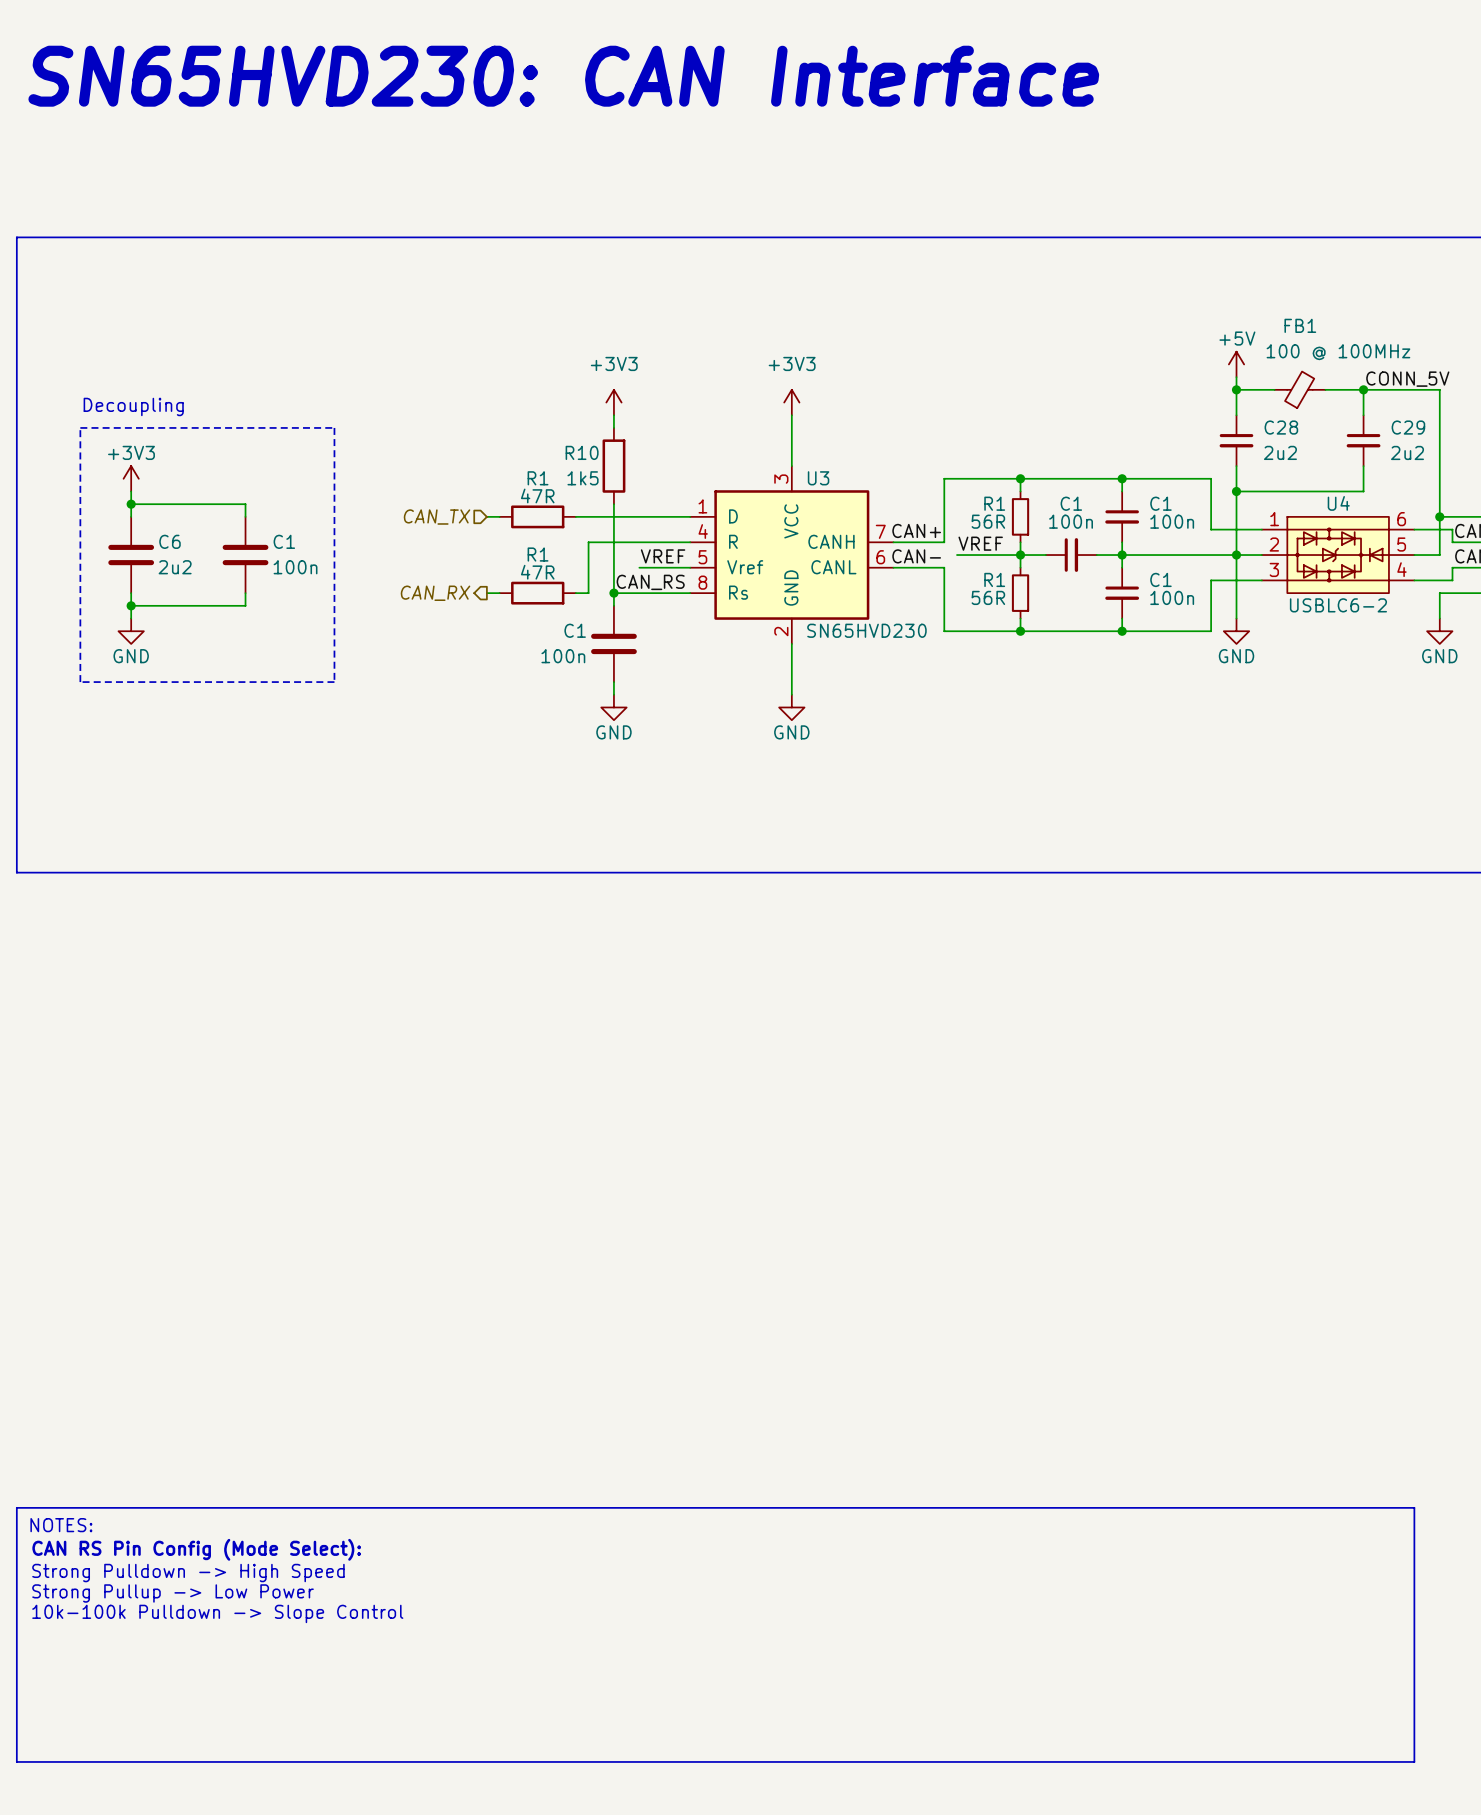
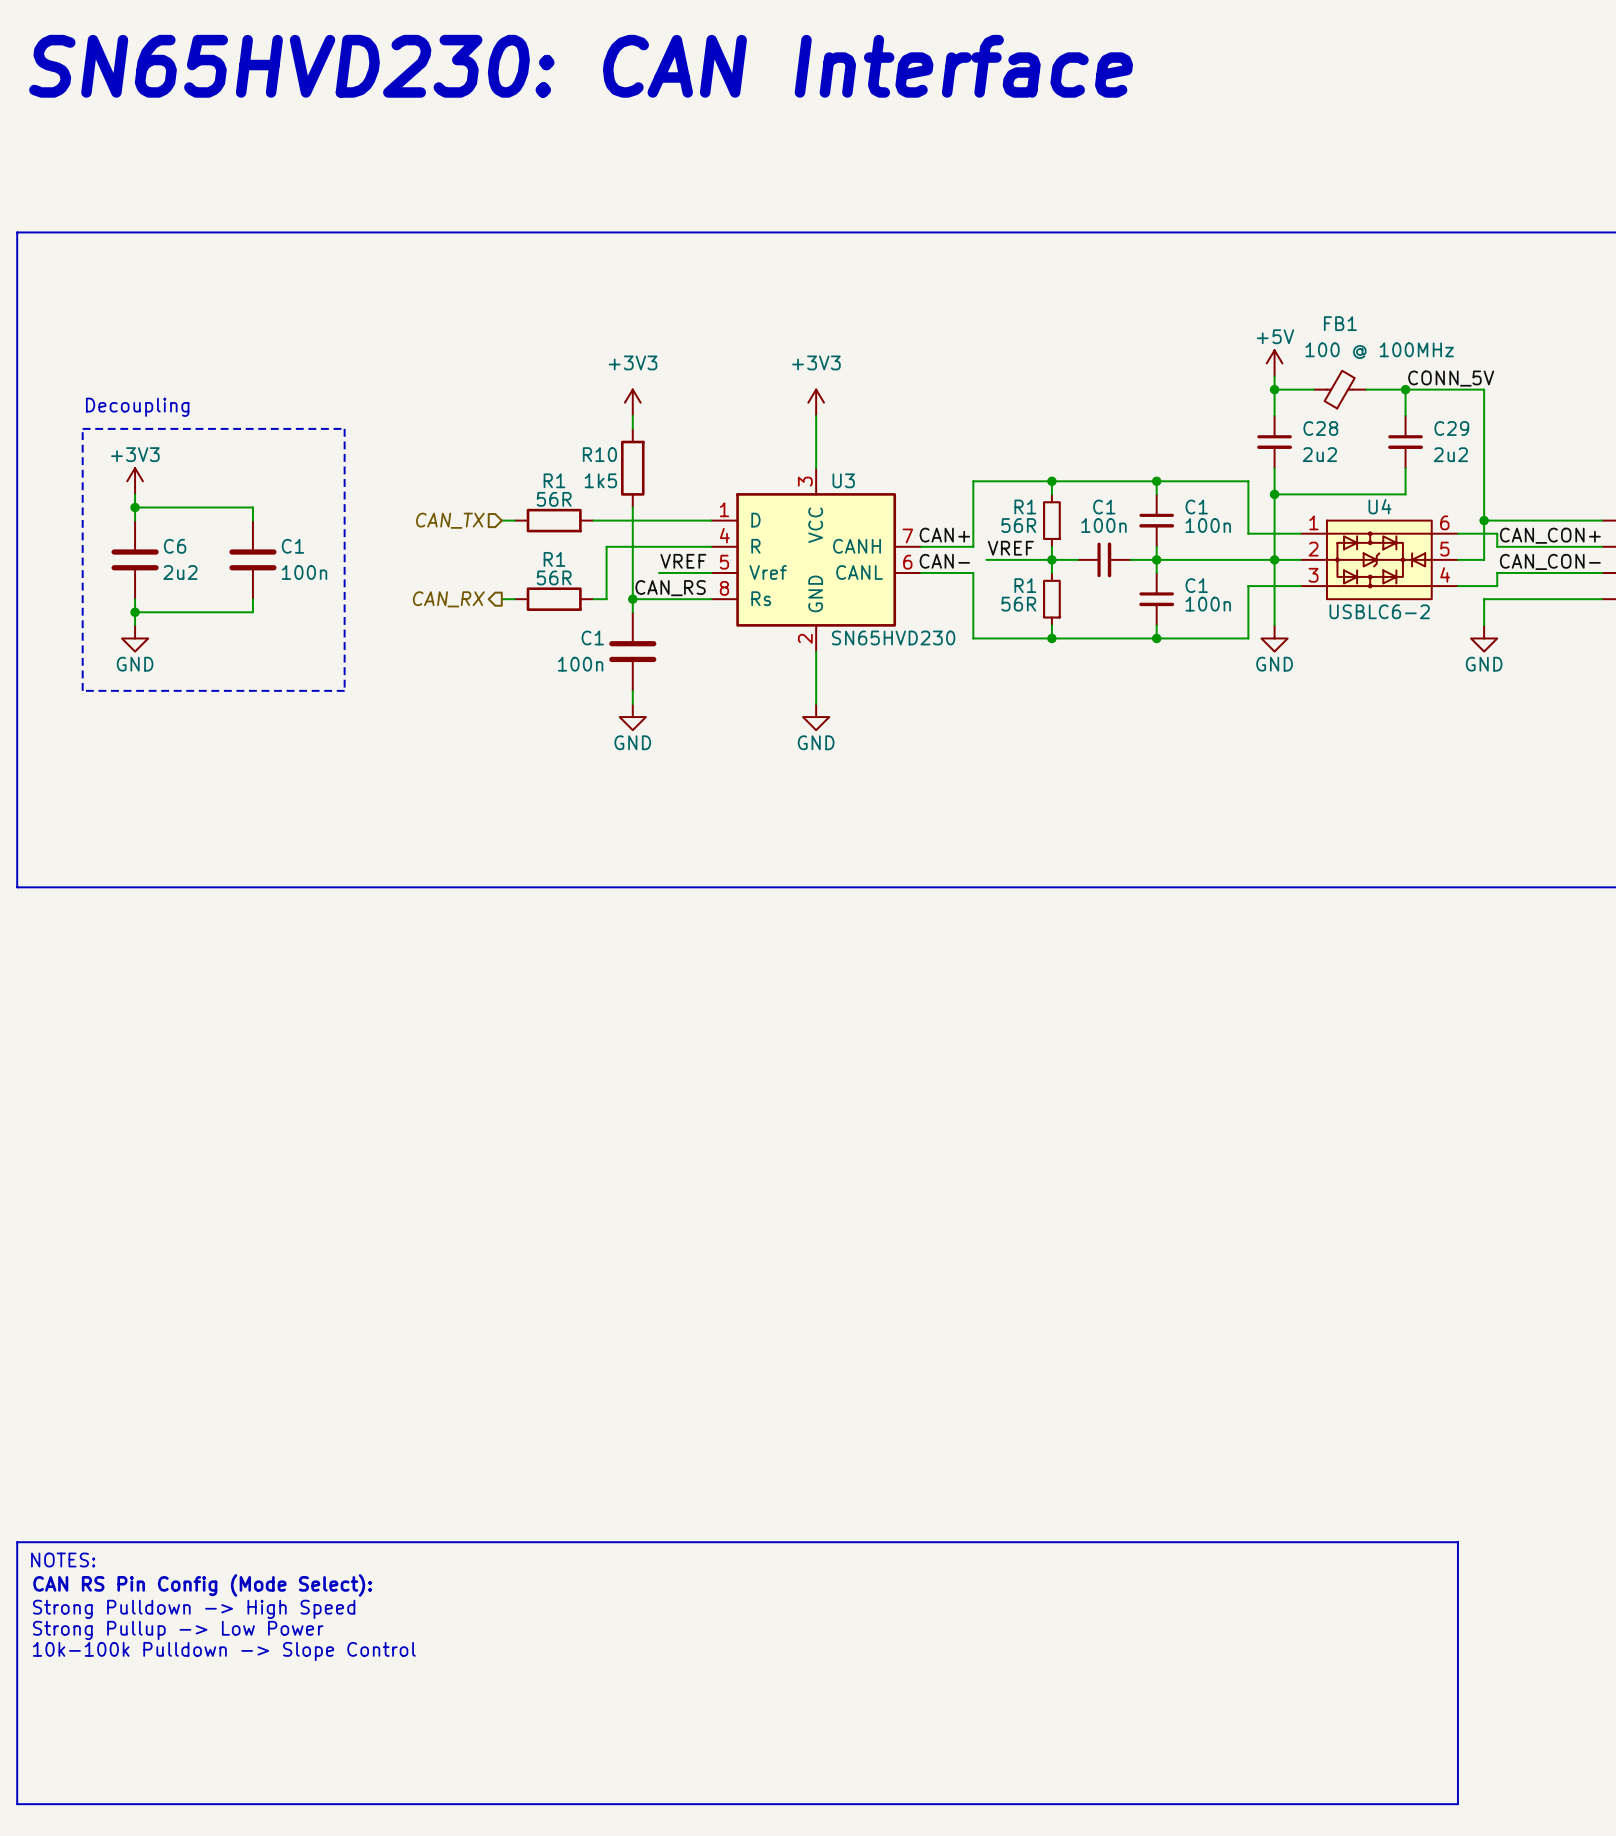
R1 value: 47R (537, 495) -> 56R (554, 499)
R1 value: 47R (537, 572) -> 56R (554, 577)

